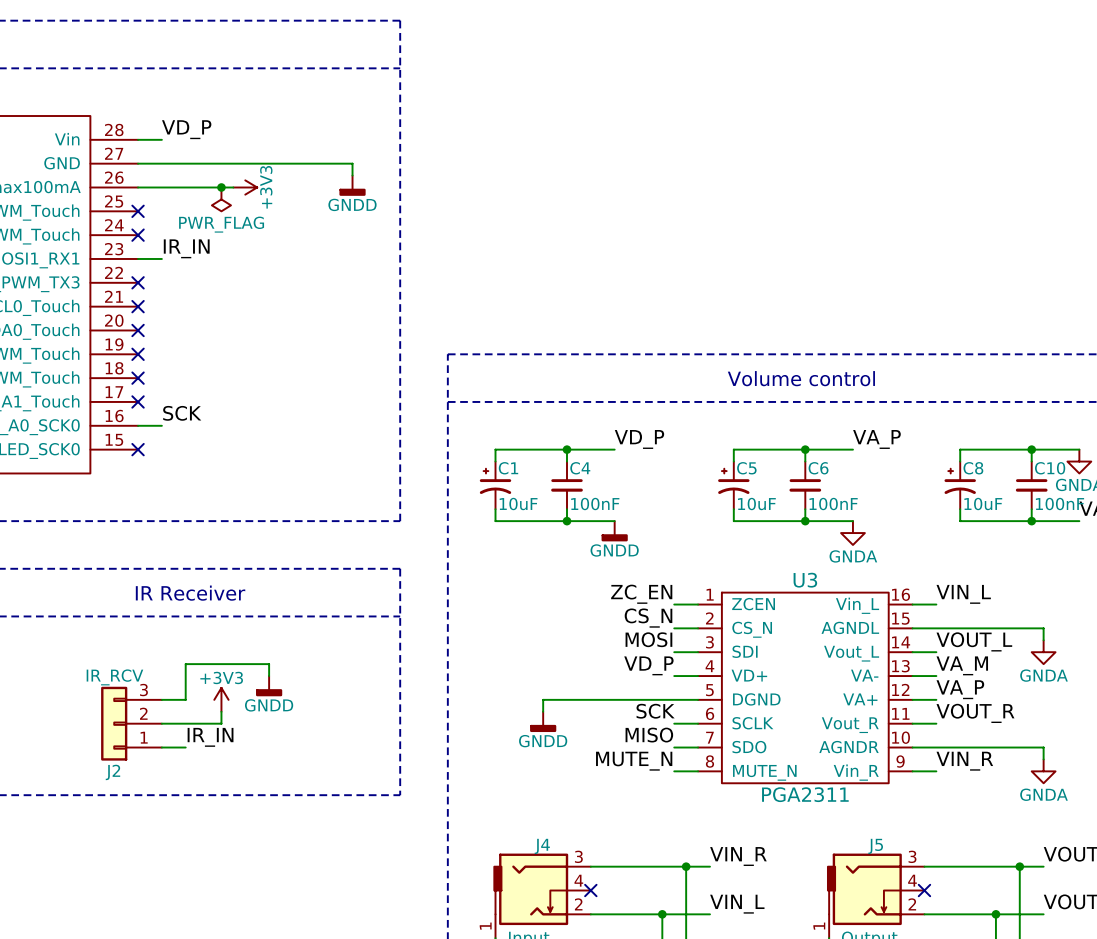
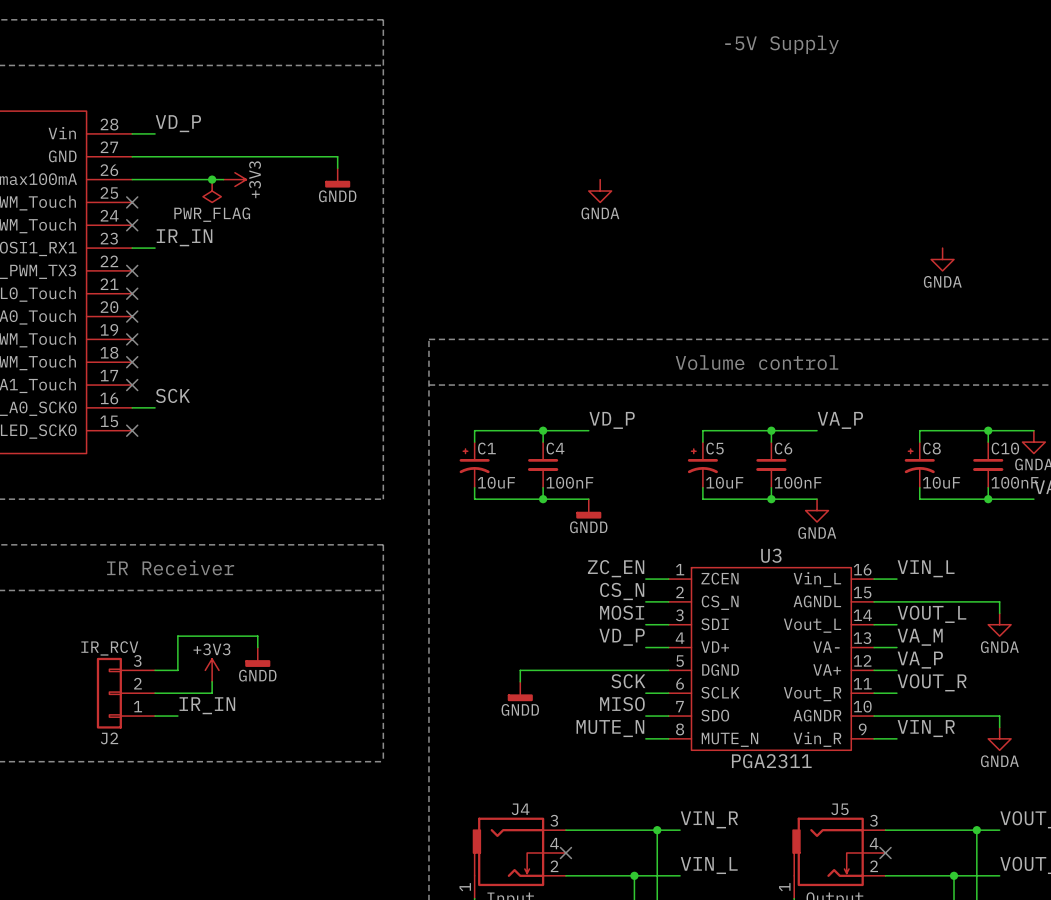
text: none -> -5V Supply (782, 44)
power symbol: none -> GNDA (600, 191)
power symbol: none -> GNDA (942, 259)

